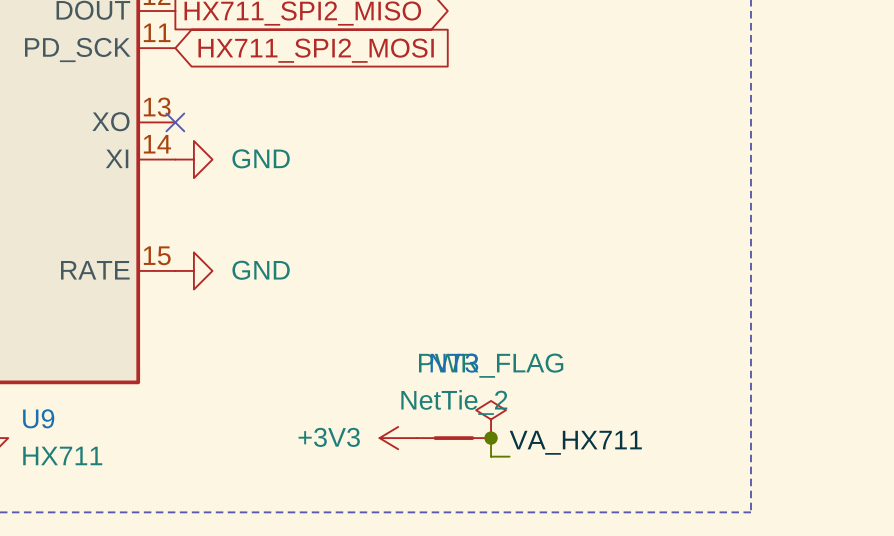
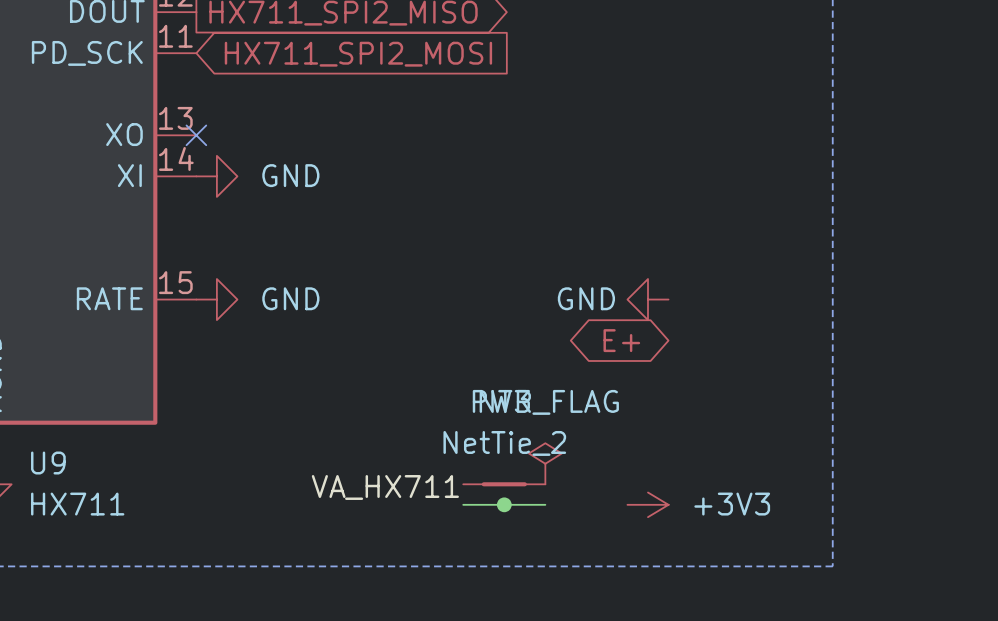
power symbol: none -> GND (648, 299)
global label: none -> E+ (621, 340)
power symbol rotation: 0° (398, 438) -> 180° (648, 504)
power symbol position: +3V3 (398, 438) -> +3V3 (648, 504)
wire: (491, 438) (491, 456) (509, 456) -> none
junction position: (491, 438) -> (504, 504)
label position: VA_HX711 (575, 442) -> VA_HX711 (385, 487)
wire: none -> (463, 504) (545, 504)

